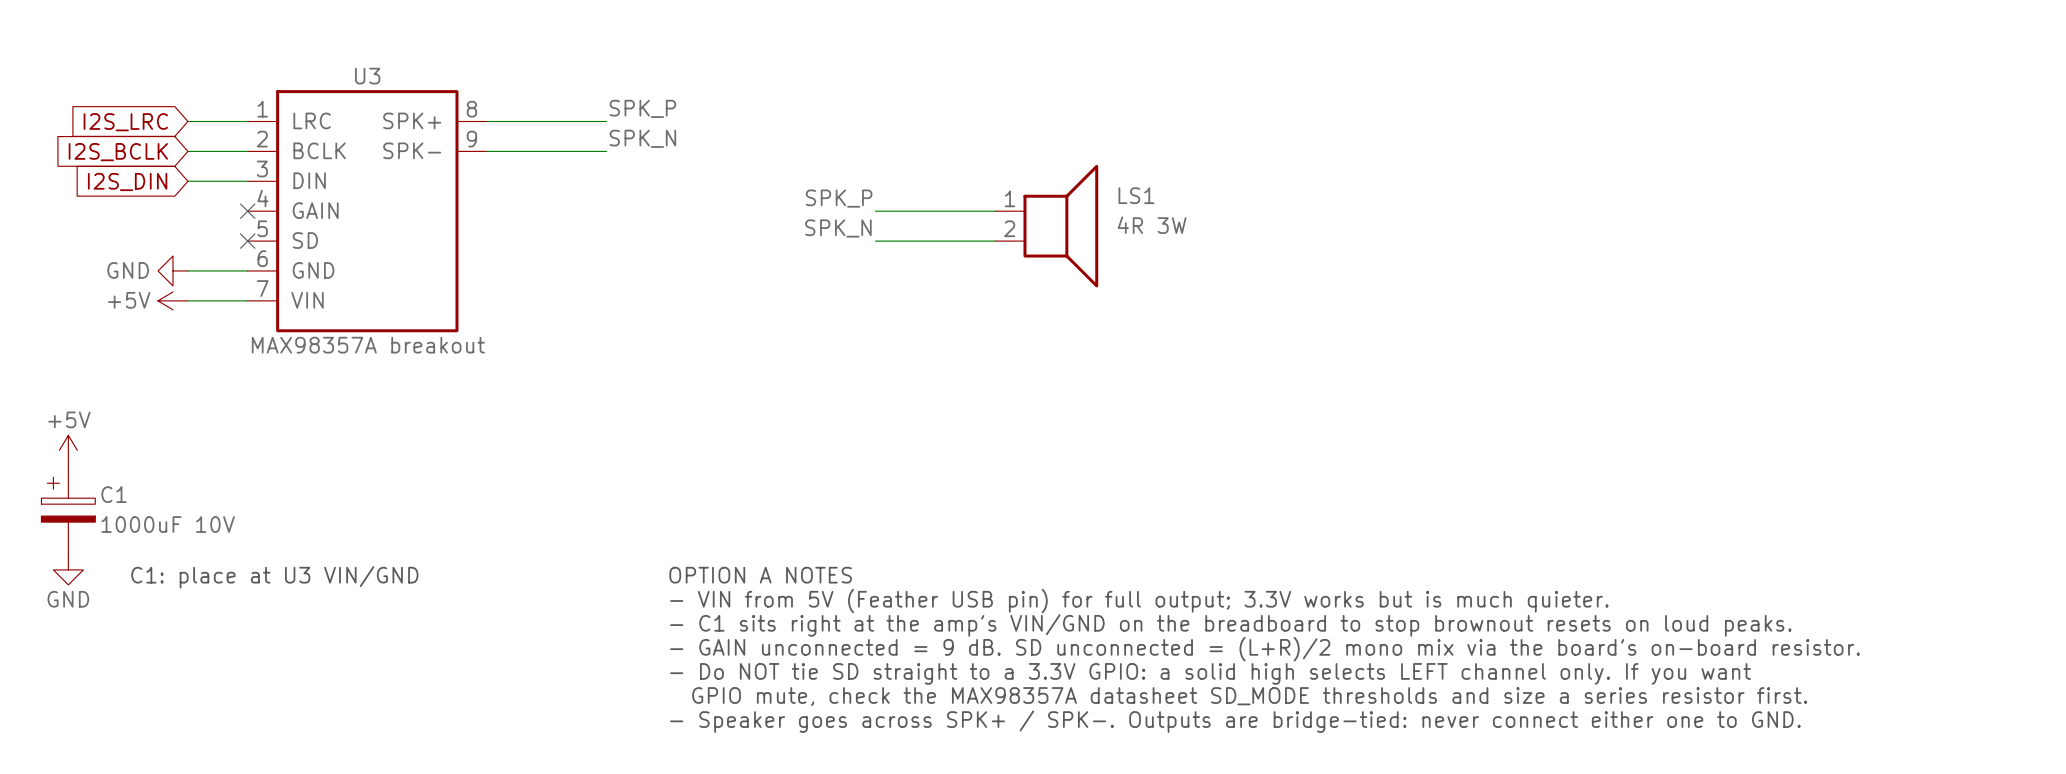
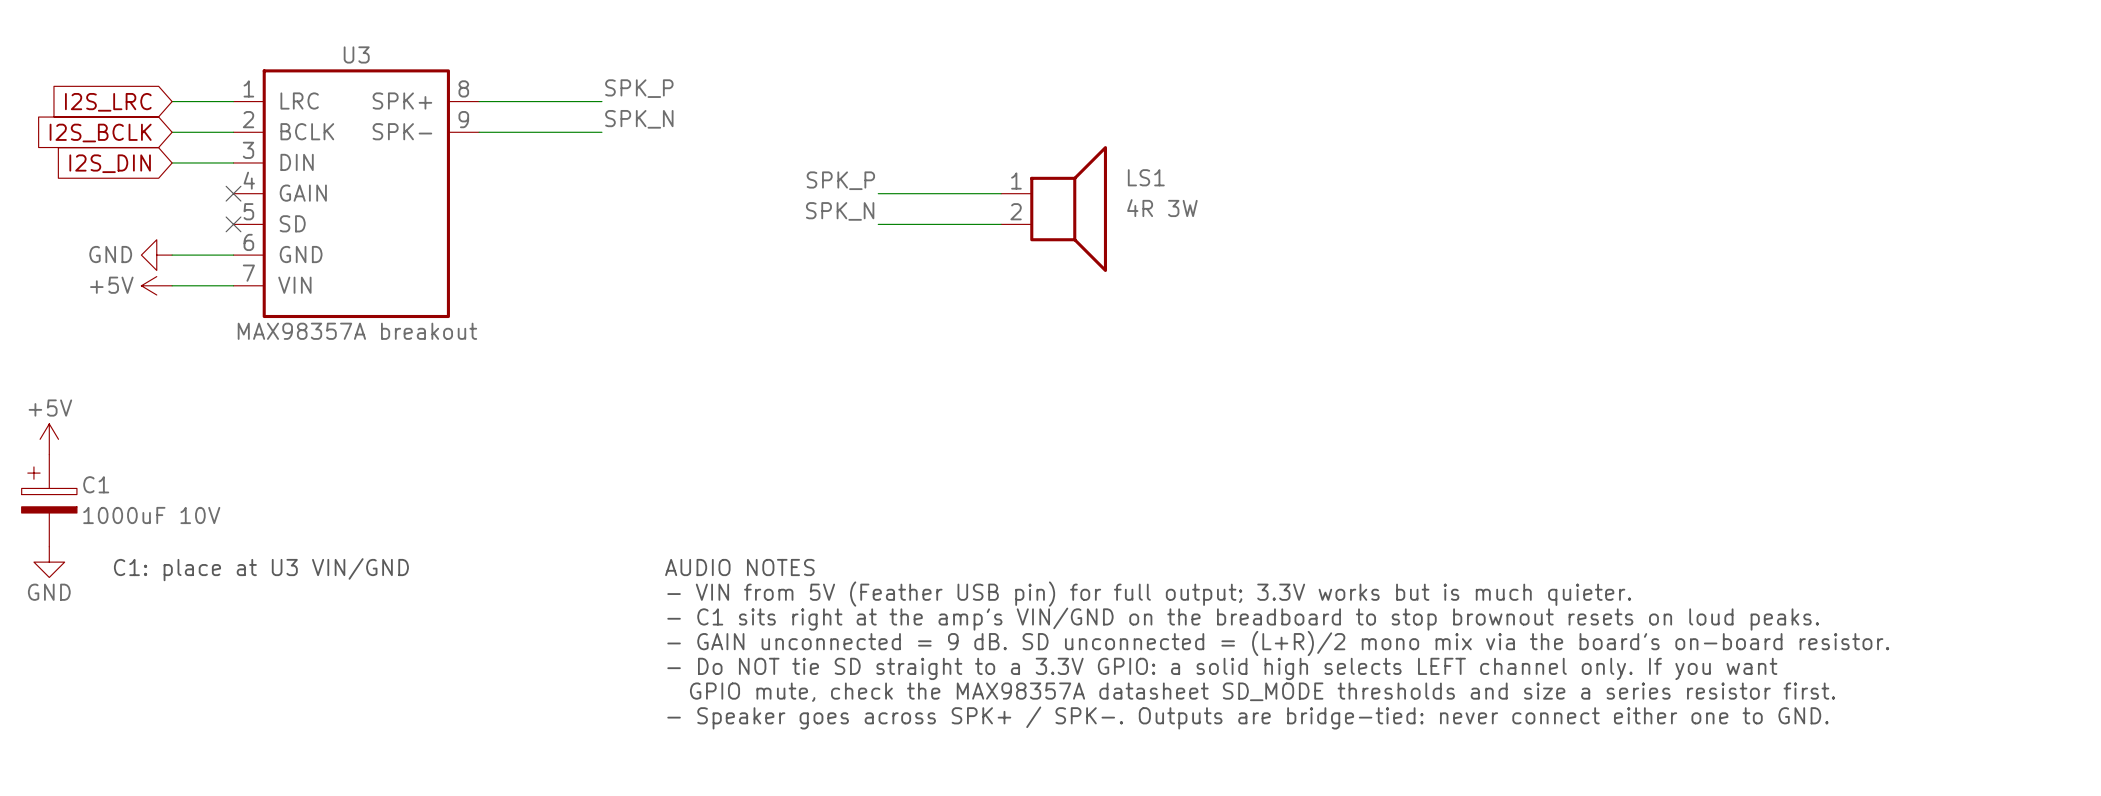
text: OPTION A NOTES (760, 575) -> AUDIO NOTES (739, 567)

